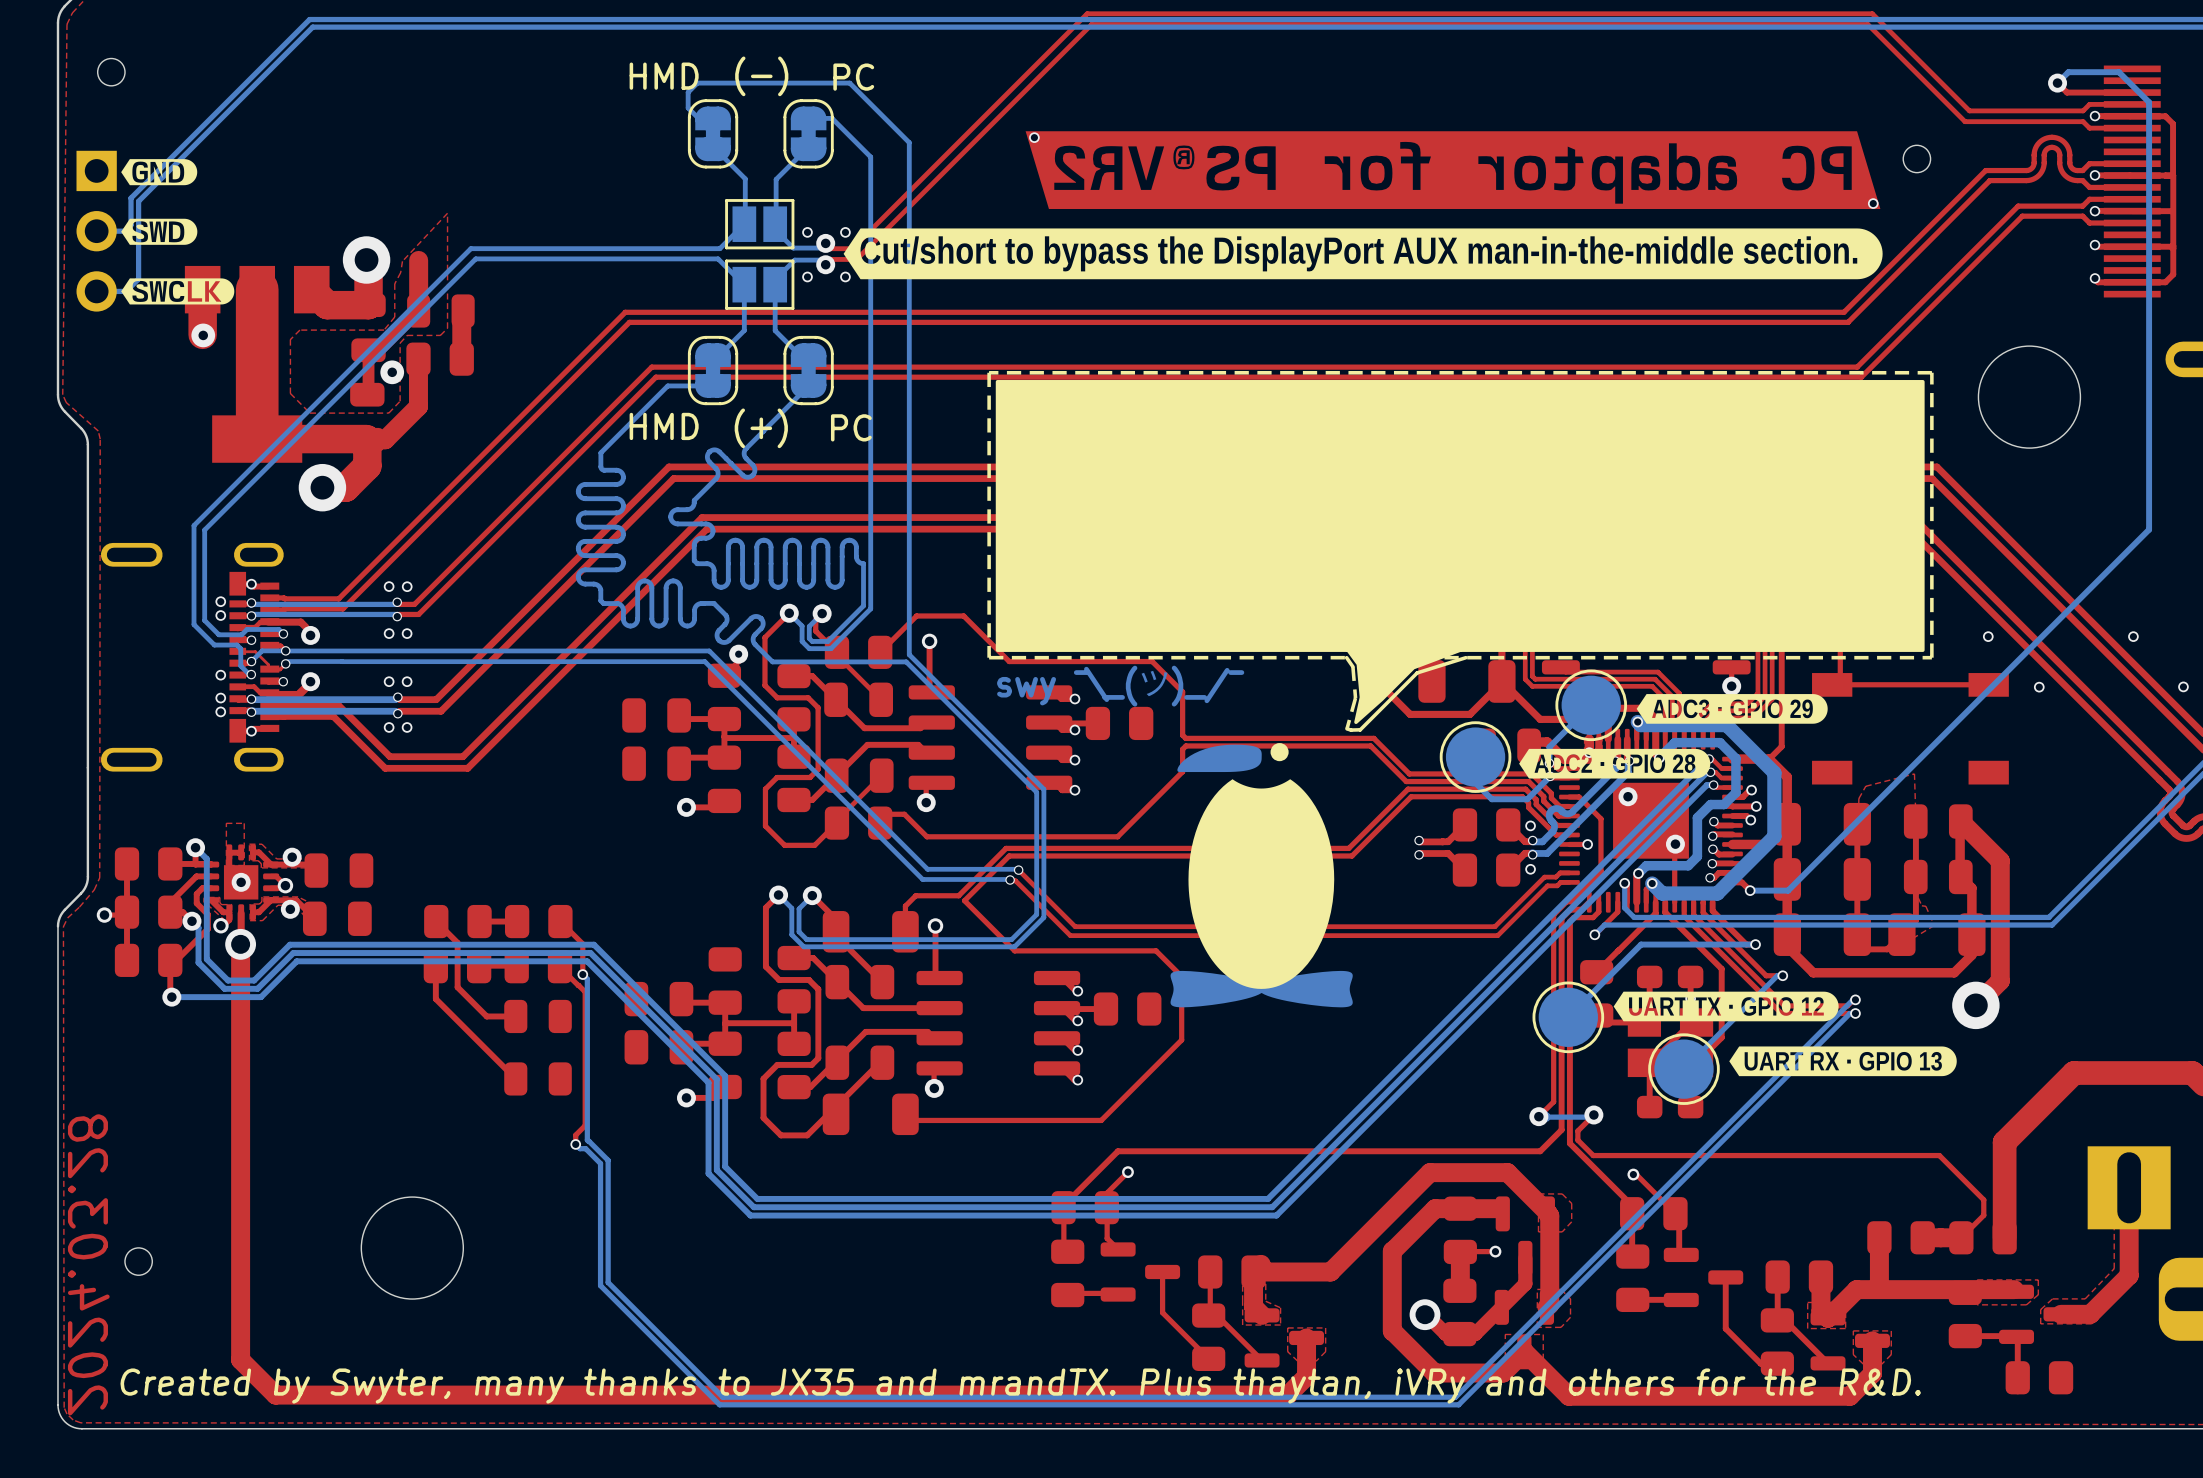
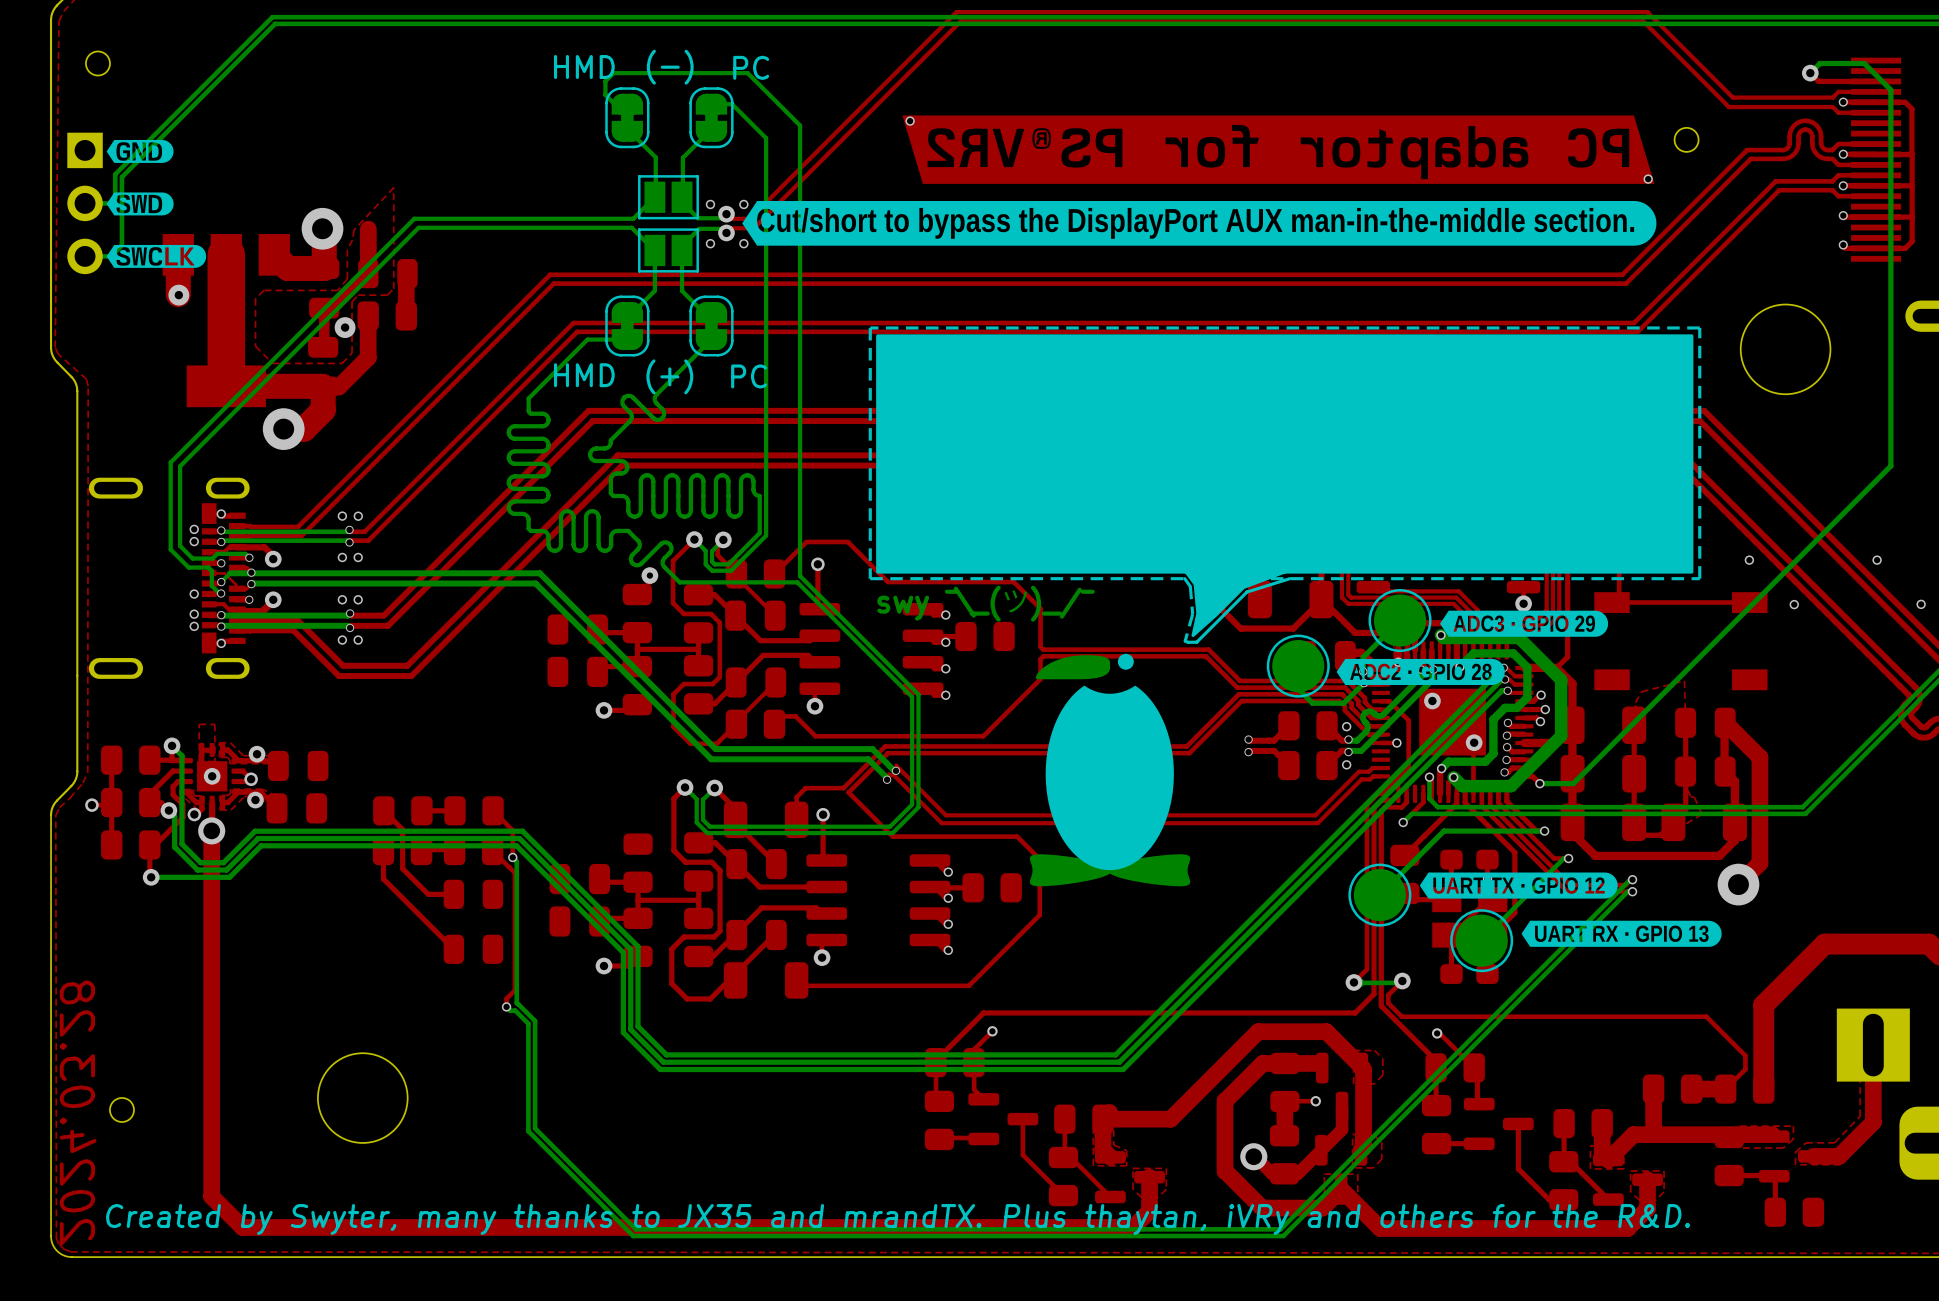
bottom track: (285, 650) (261, 651) -> (896, 770) (872, 749) (715, 749) (539, 573) (230, 573)
bottom track: (285, 650) (709, 650) (927, 869) (1018, 870) -> none
bottom track: (288, 661) (704, 661) (922, 879) (1010, 880) -> none
bottom track: none -> (251, 584) (535, 583) (711, 759) (868, 759) (887, 779)
via: (1018, 870) -> none
via: none -> (896, 770)
via: (1010, 880) -> none
via: none -> (887, 779)

